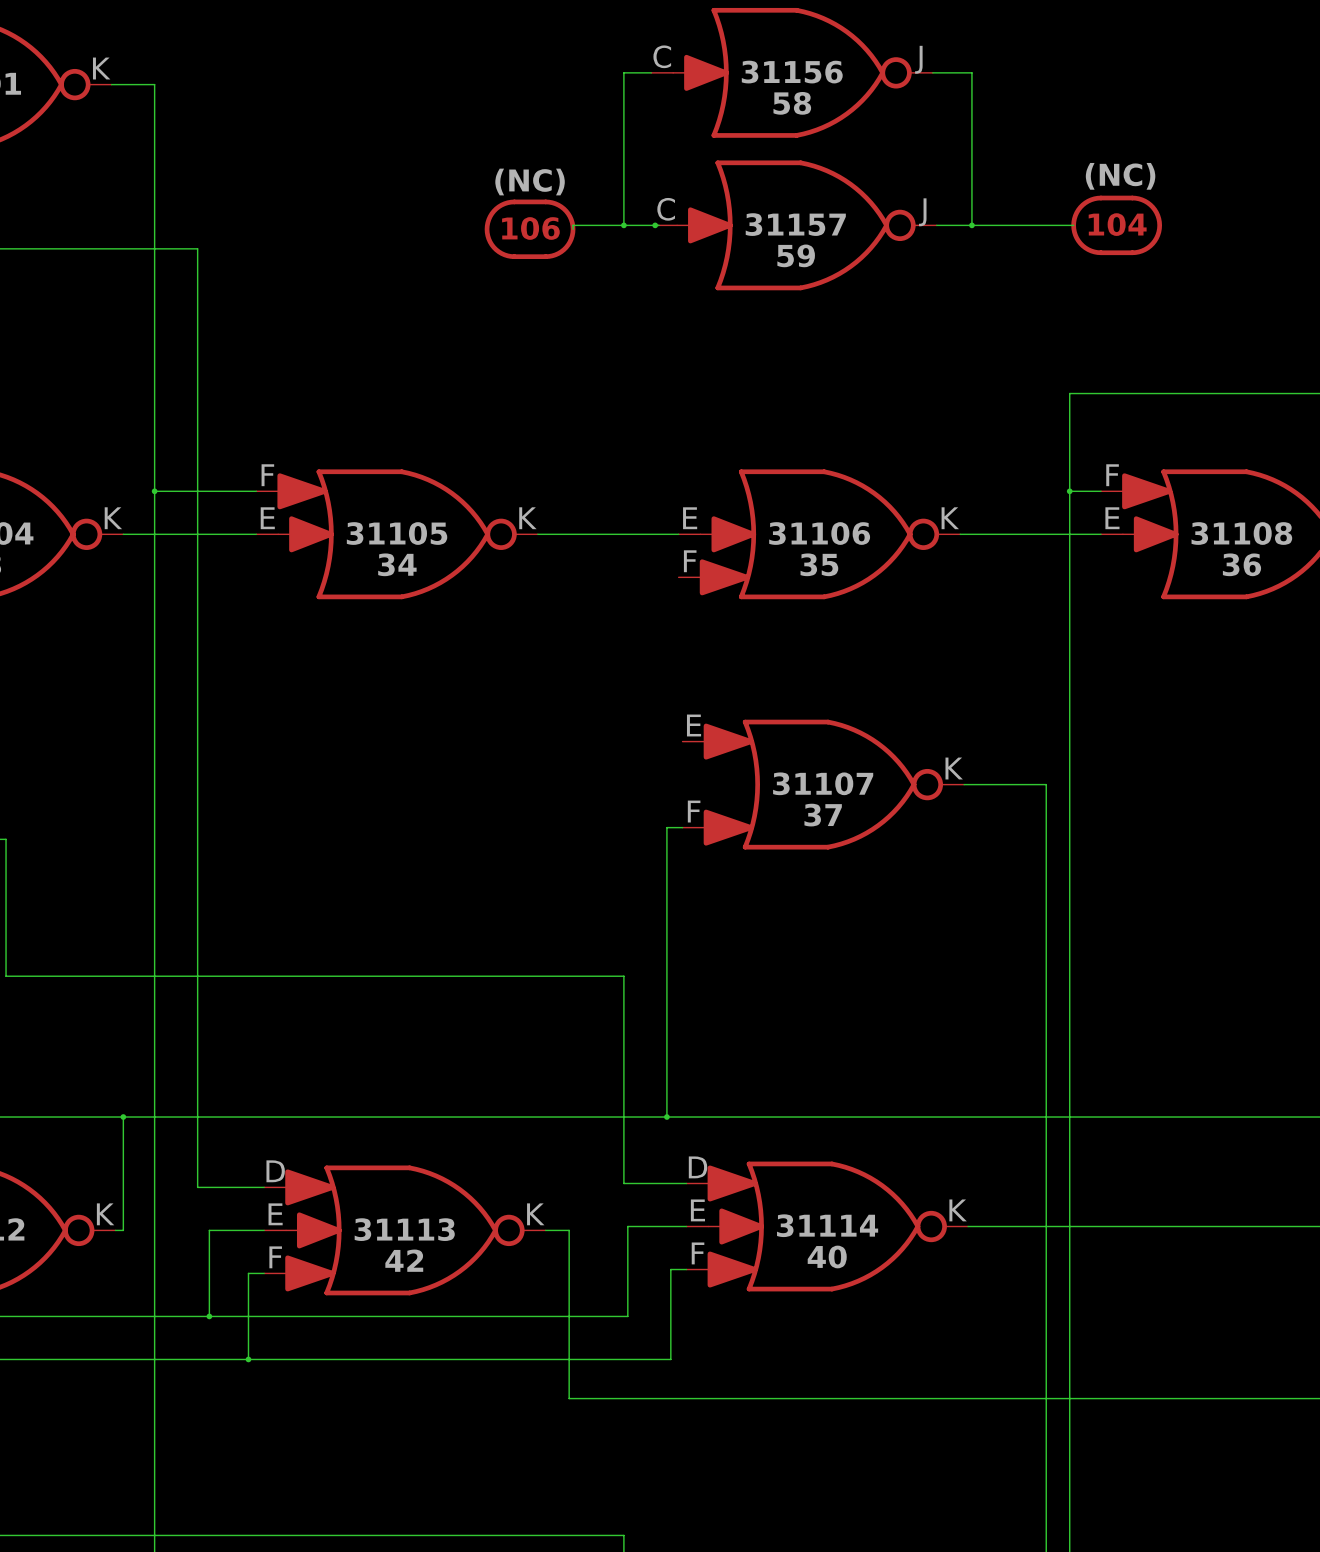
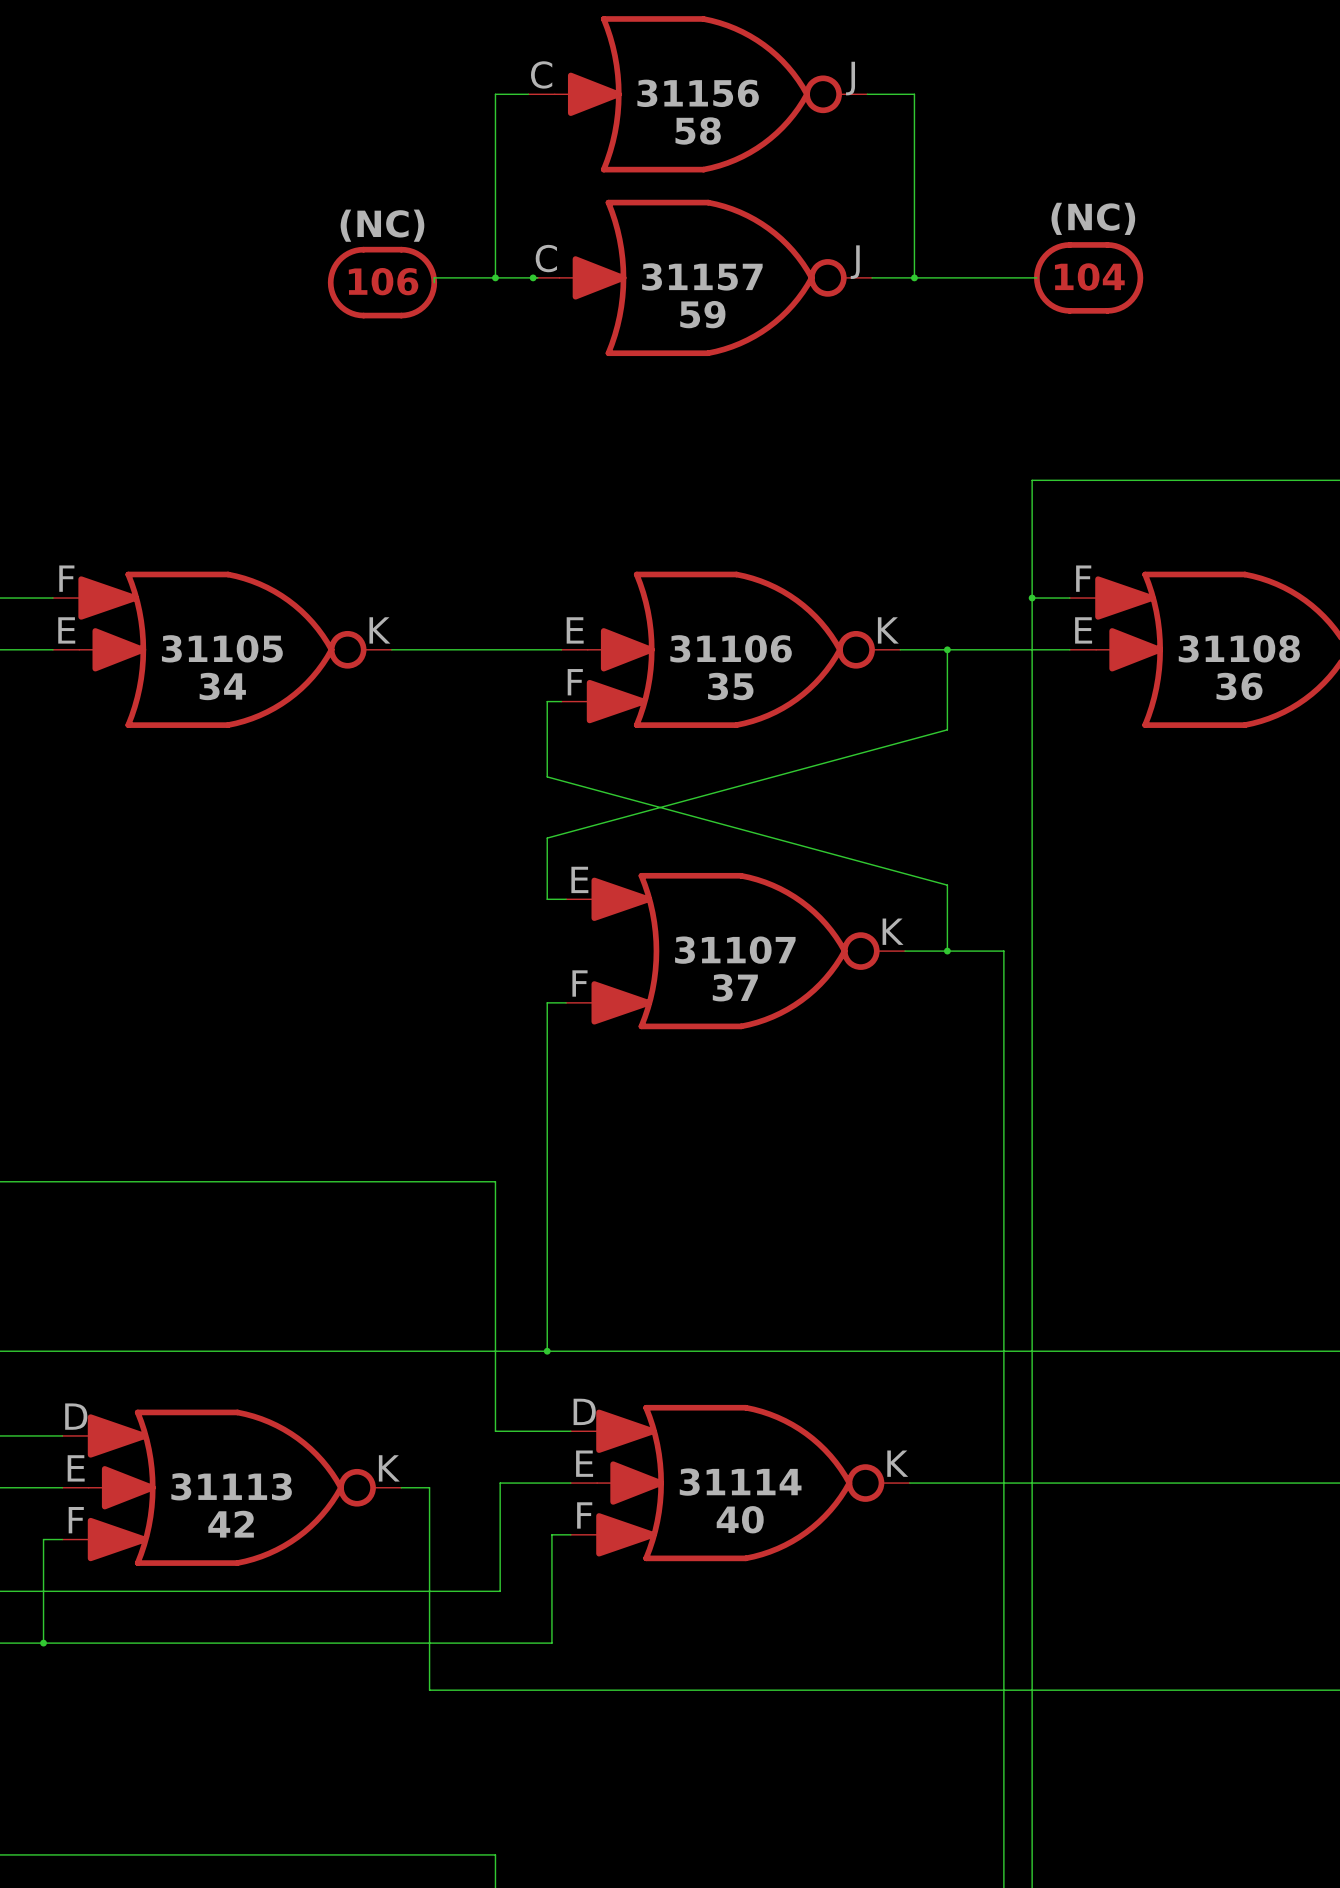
wire: none -> (947, 649) (947, 729) (547, 838) (547, 899) (566, 899)
junction: none -> (947, 649)
wire: none -> (561, 701) (547, 701) (547, 776) (947, 885) (947, 951)
junction: none -> (947, 951)

